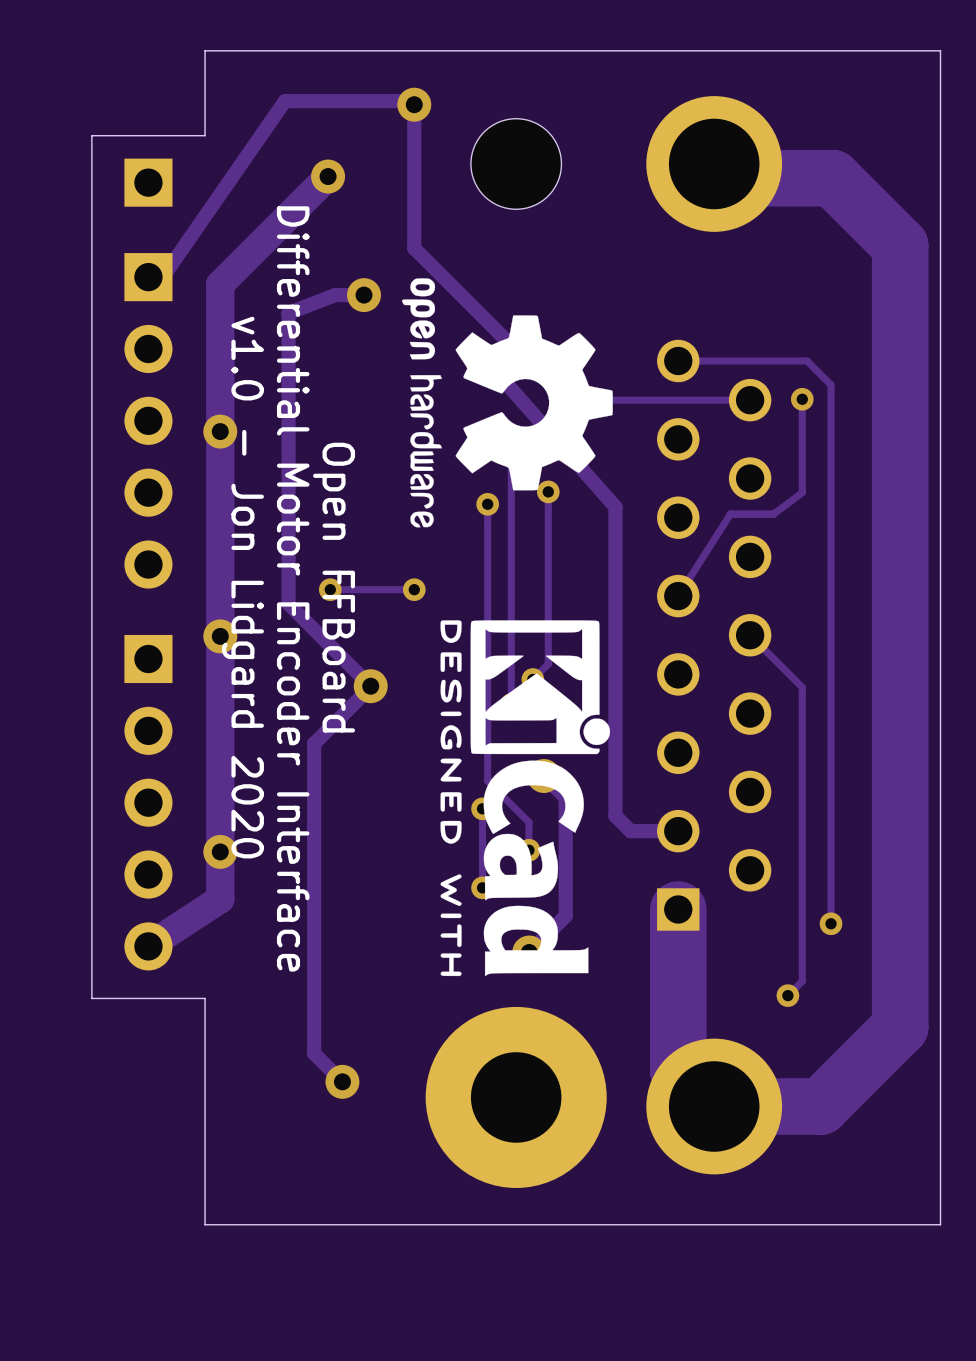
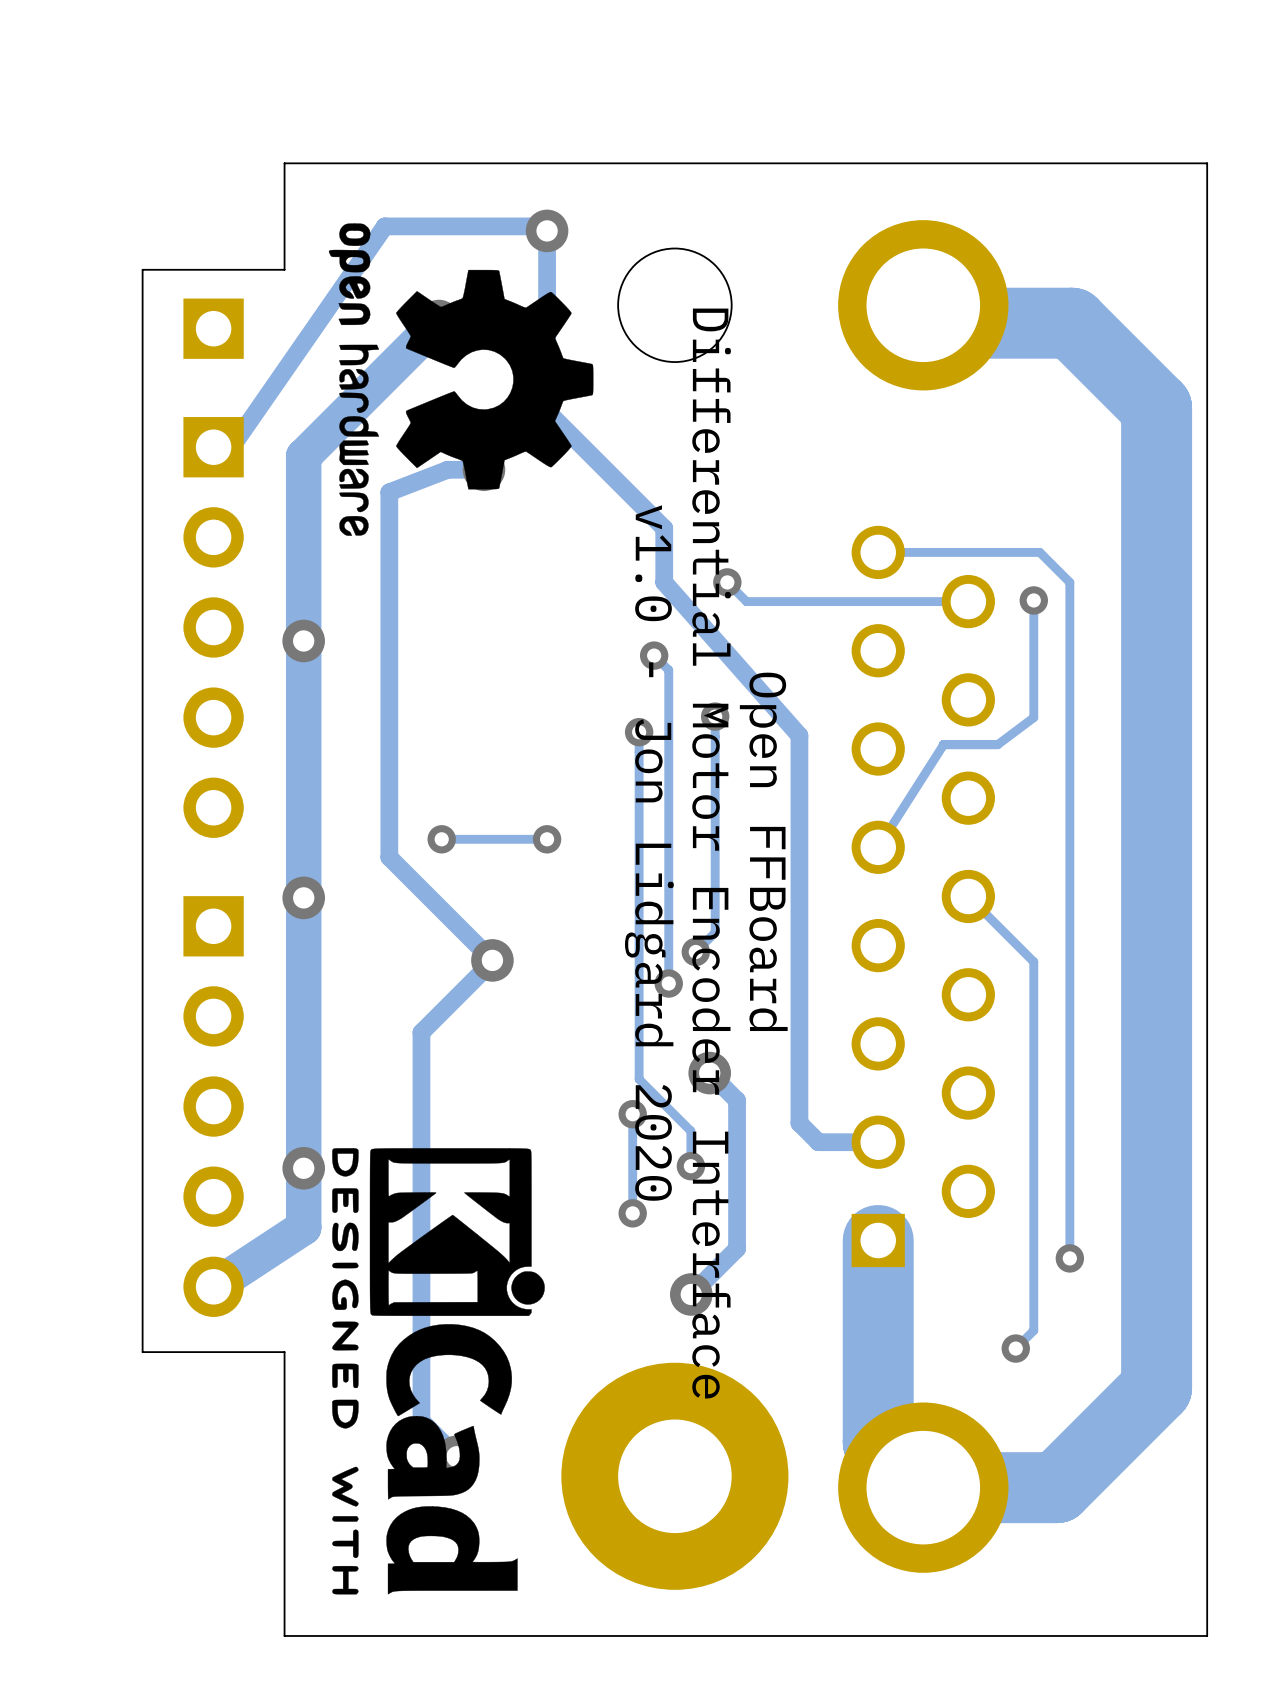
drawing position: (507, 402) -> (461, 379)
text position: v1.0 - Jon Lidgard 2020 (242, 587) -> v1.0 - Jon Lidgard 2020 (649, 853)
text position: Open FFBoard (334, 587) -> Open FFBoard (763, 851)
text position: Differential Motor Encoder Interface (293, 588) -> Differential Motor Encoder Interface (711, 853)
drawing position: (525, 798) -> (438, 1371)

